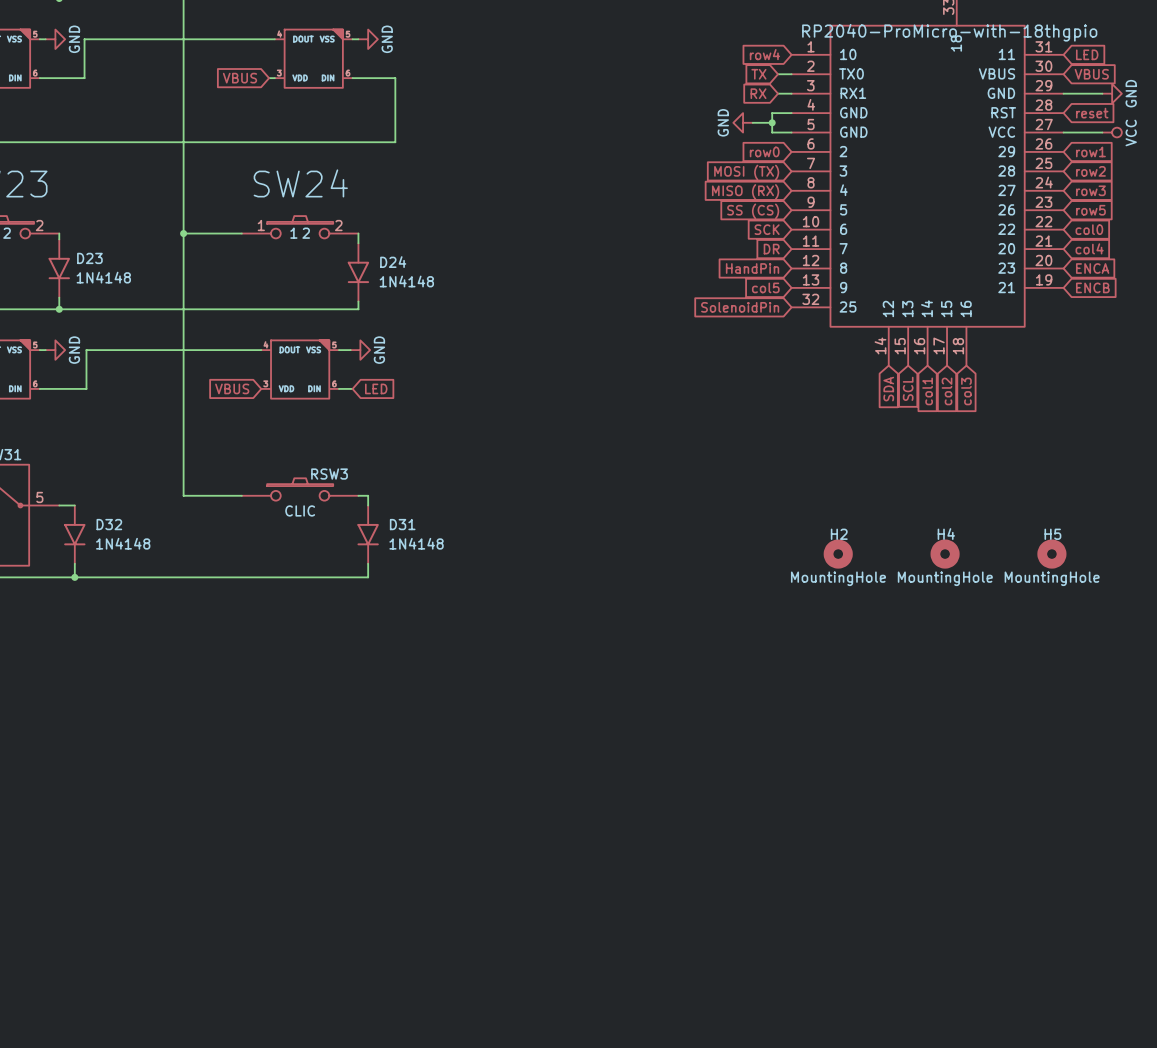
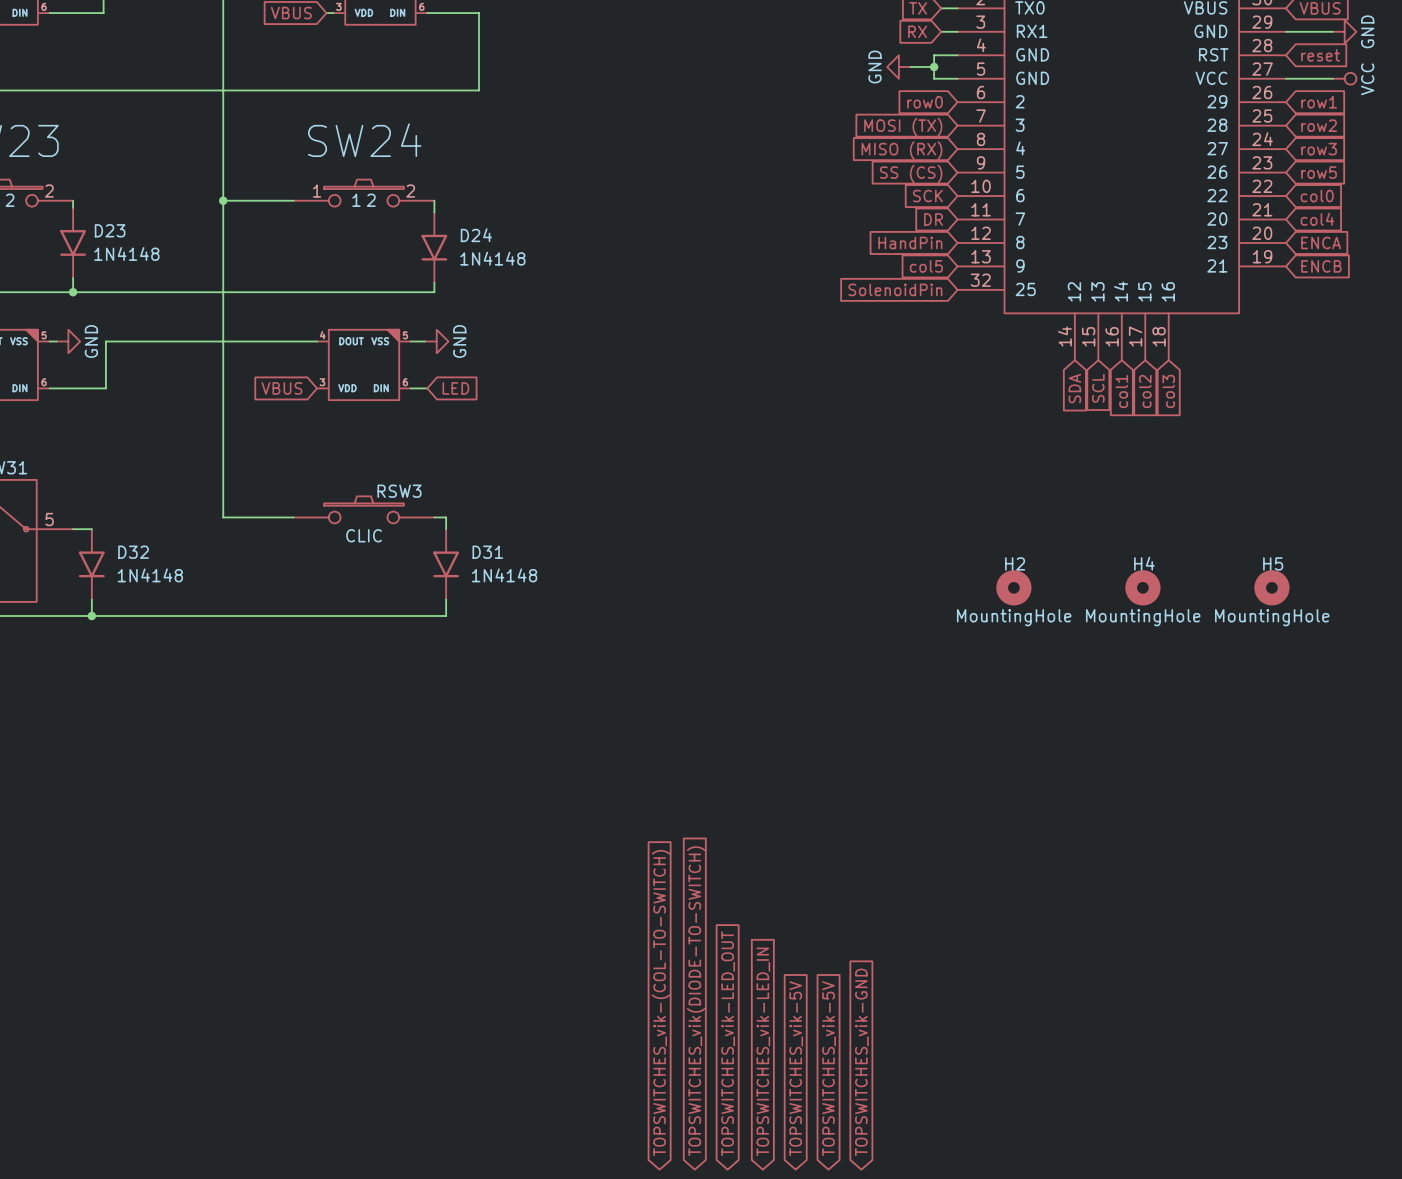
global label: none -> TOPSWITCHES_vik(DIODE-TO-SWITCH) (696, 1001)
global label: none -> TOPSWITCHES_vik-(COL-TO-SWITCH) (660, 1003)
global label: none -> TOPSWITCHES_vik-LED_OUT (728, 1043)
global label: none -> TOPSWITCHES_vik-LED_IN (763, 1051)
global label: none -> TOPSWITCHES_vik-GND (861, 1062)
global label: none -> TOPSWITCHES_vik-5V (796, 1068)
global label: none -> TOPSWITCHES_vik-5V (829, 1068)

